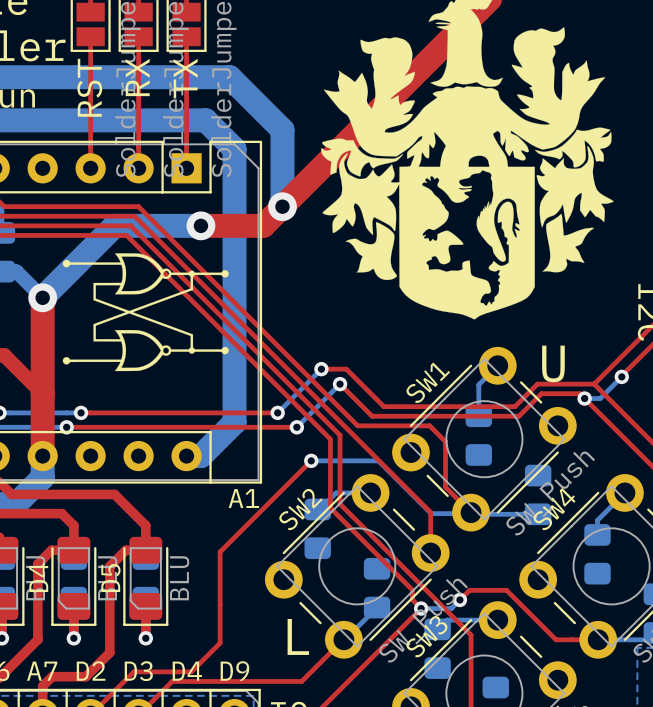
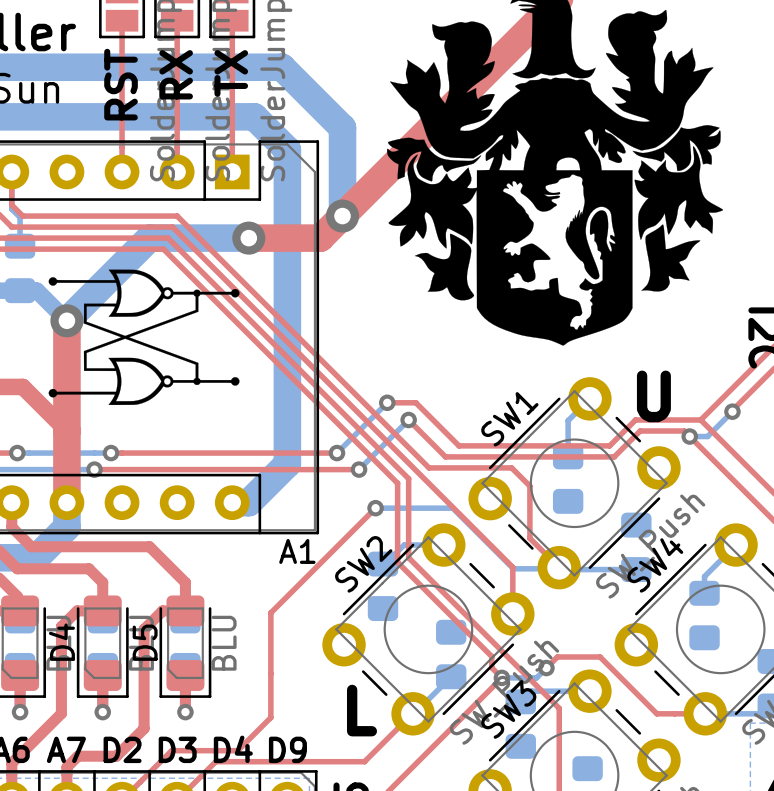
drawing position: (145, 312) -> (144, 337)

